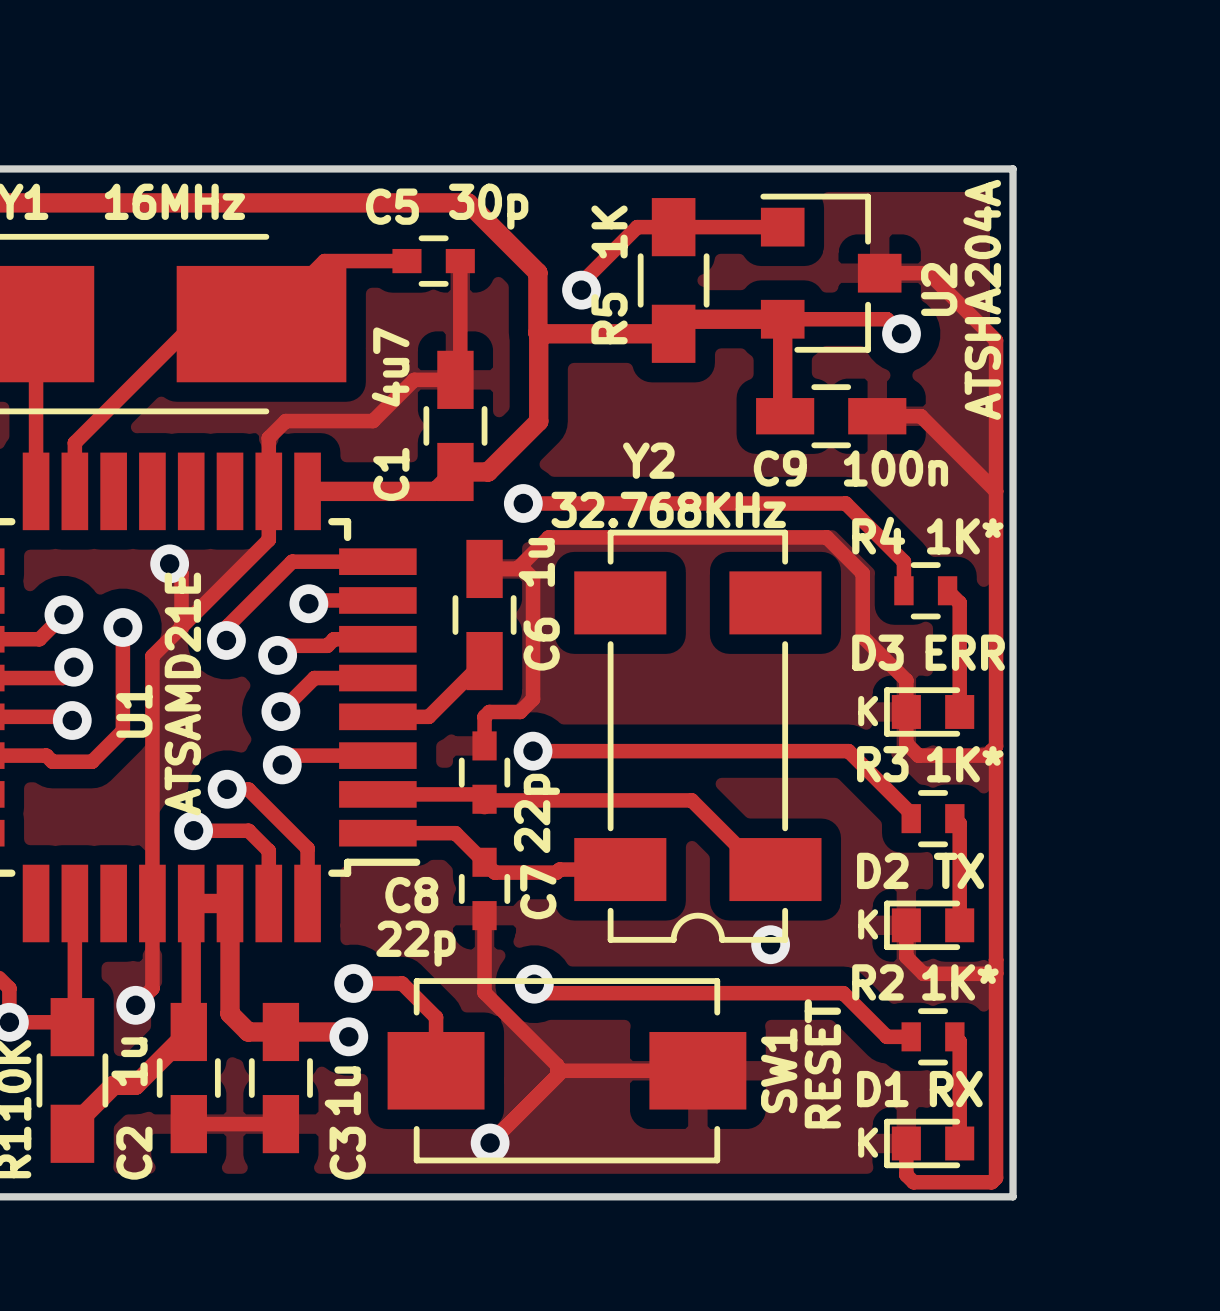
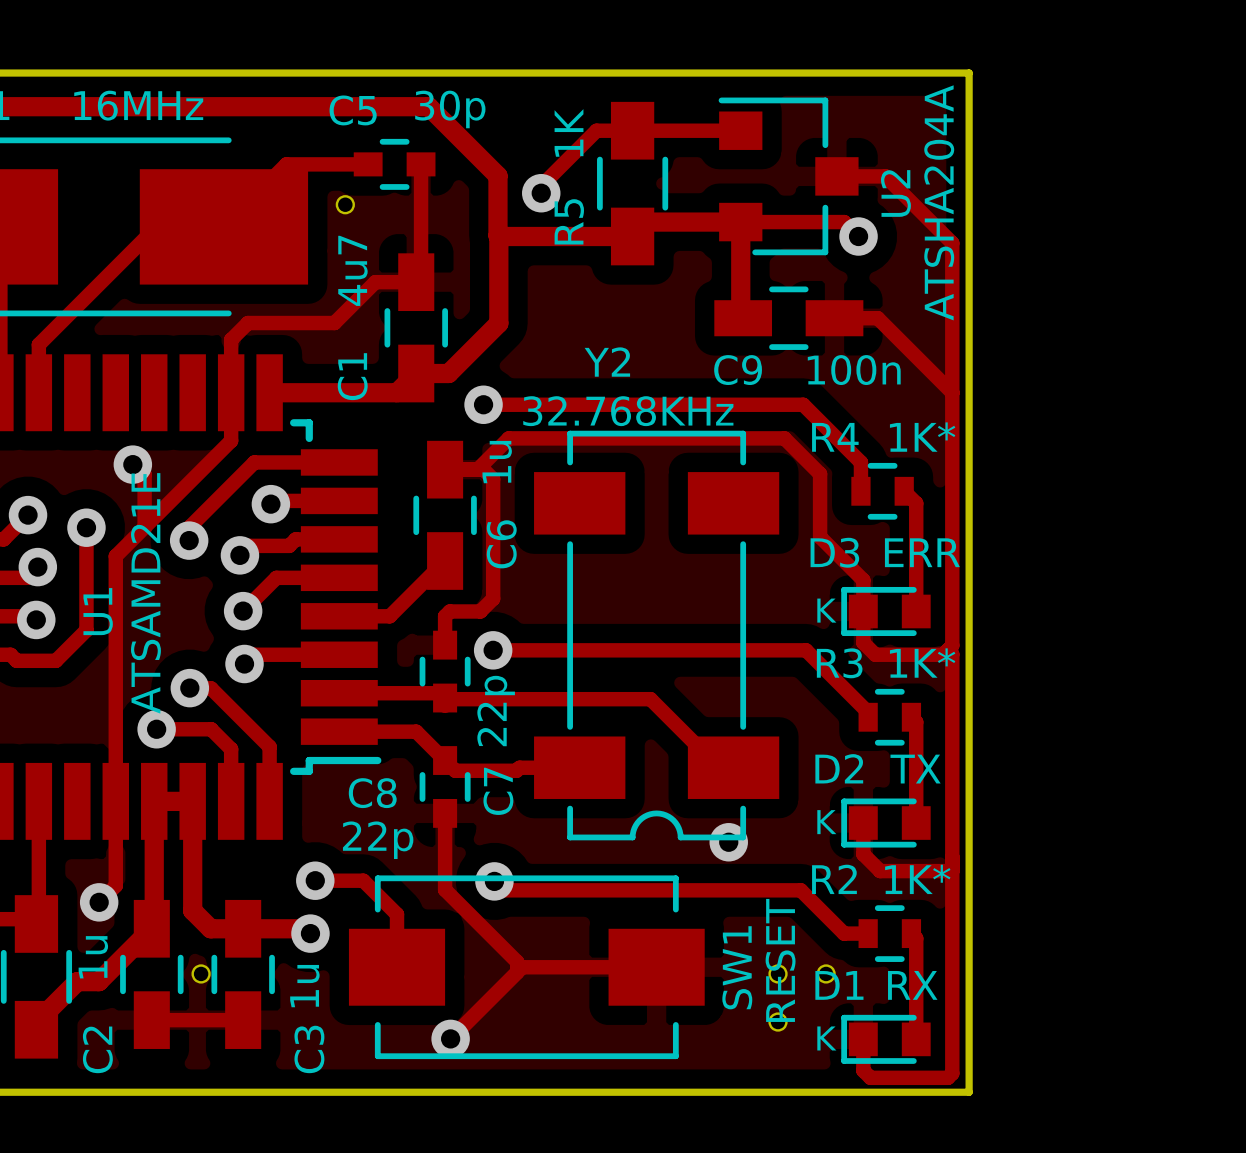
part: none -> (345, 204)
part: none -> (201, 973)
part: none -> (778, 973)
part: none -> (826, 973)
part: none -> (778, 1022)

